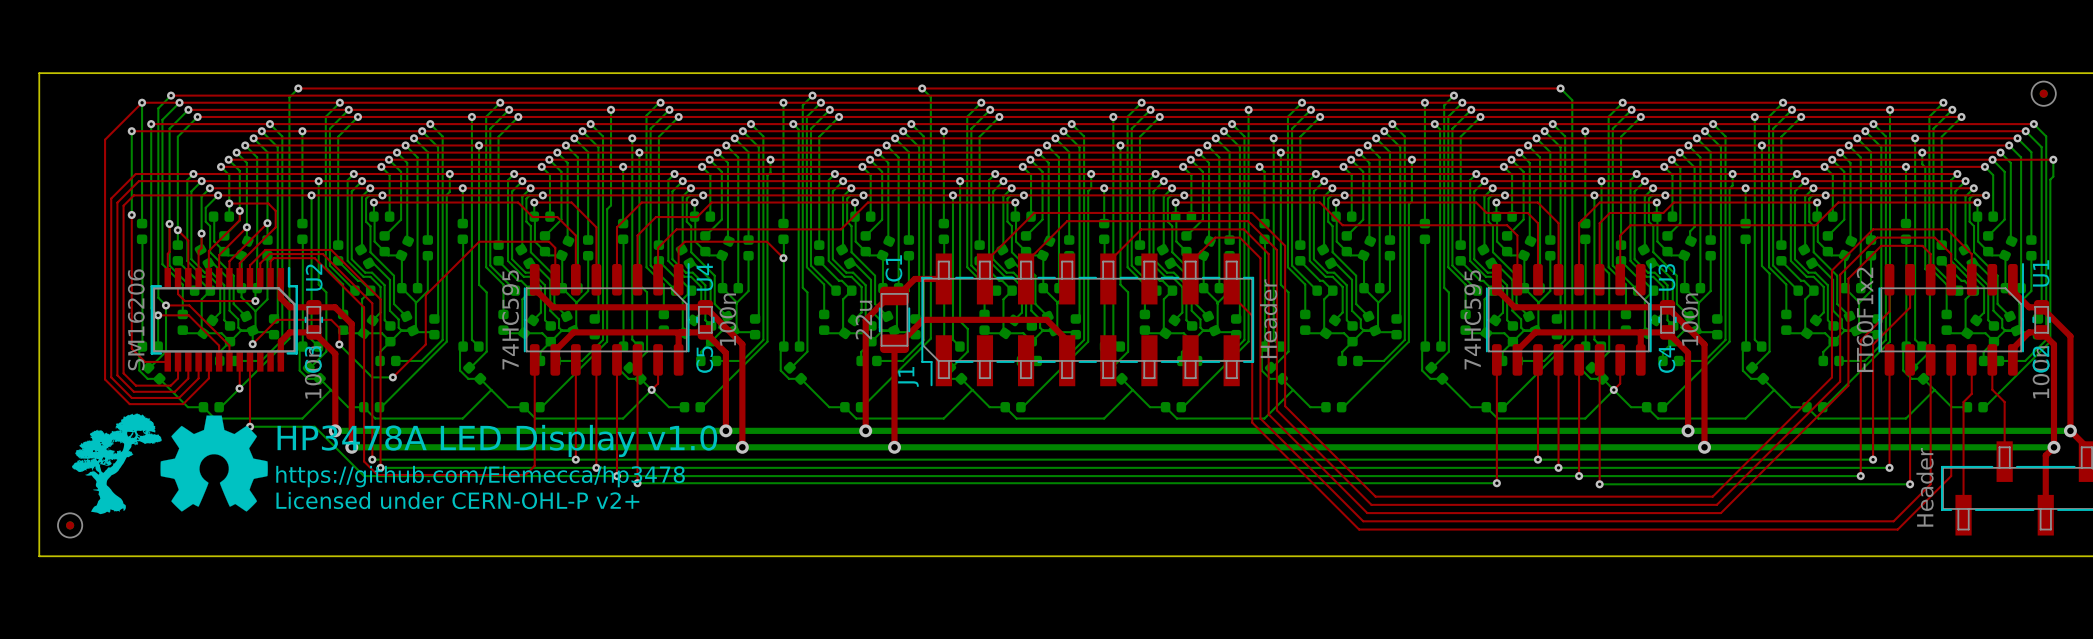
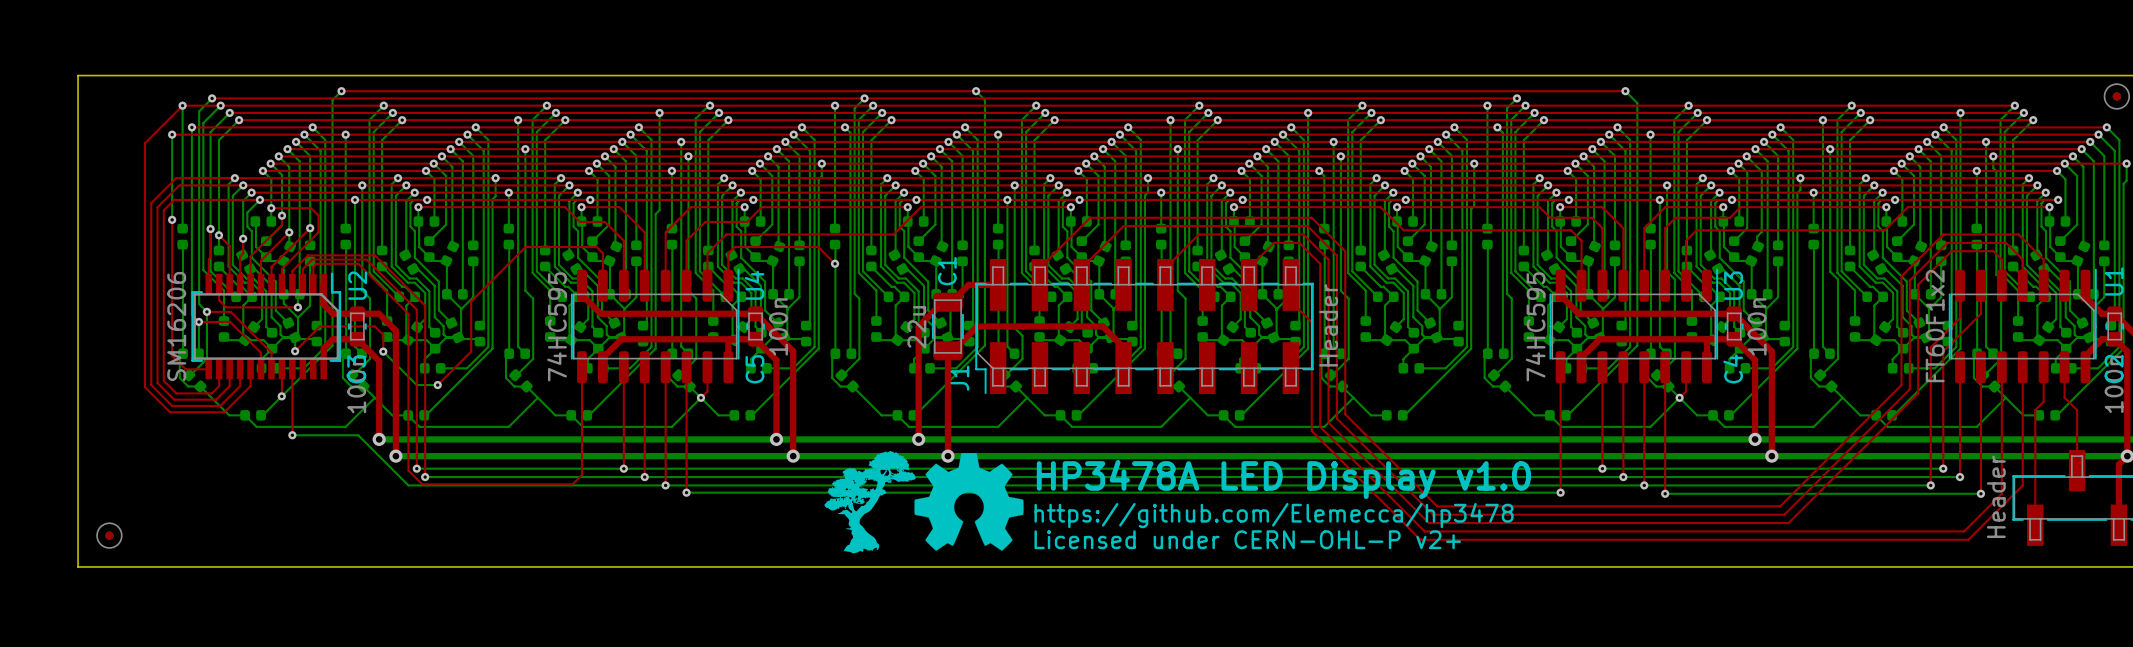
drawing: [72, 413, 268, 515] -> none
text: HP3478A LED Display v1.0 (497, 440) -> none
drawing: none -> [824, 450, 1024, 554]
text: none -> HP3478A LED Display v1.0 (1283, 479)
text: https://github.com/Elemecca/hp3478 (480, 476) -> none
text: Licensed under CERN-OHL-P v2+ (457, 500) -> none
text: none -> https://github.com/Elemecca/hp3478 (1274, 515)
text: none -> Licensed under CERN-OHL-P v2+ (1247, 539)

